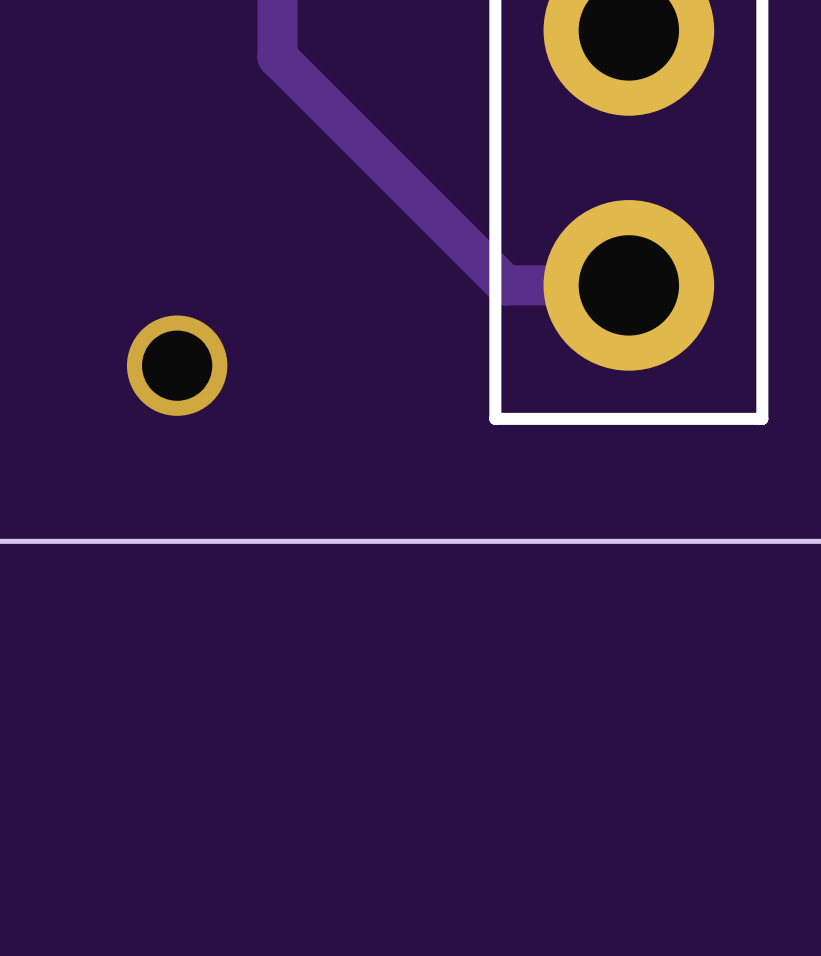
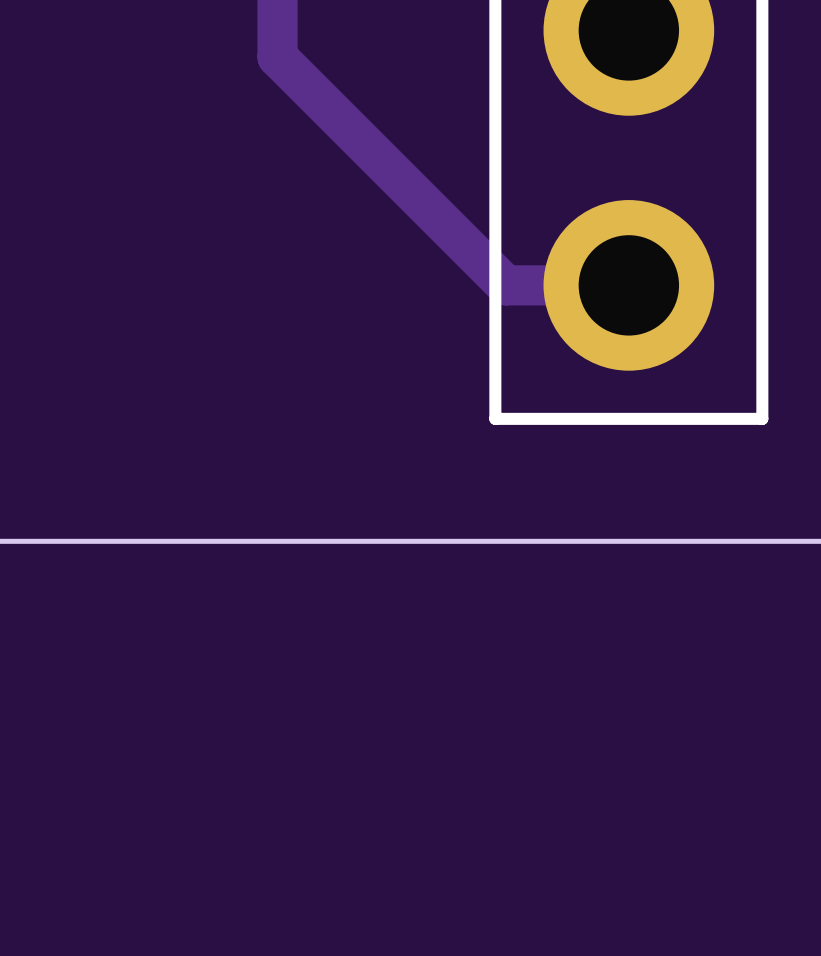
via: (177, 365) -> none

